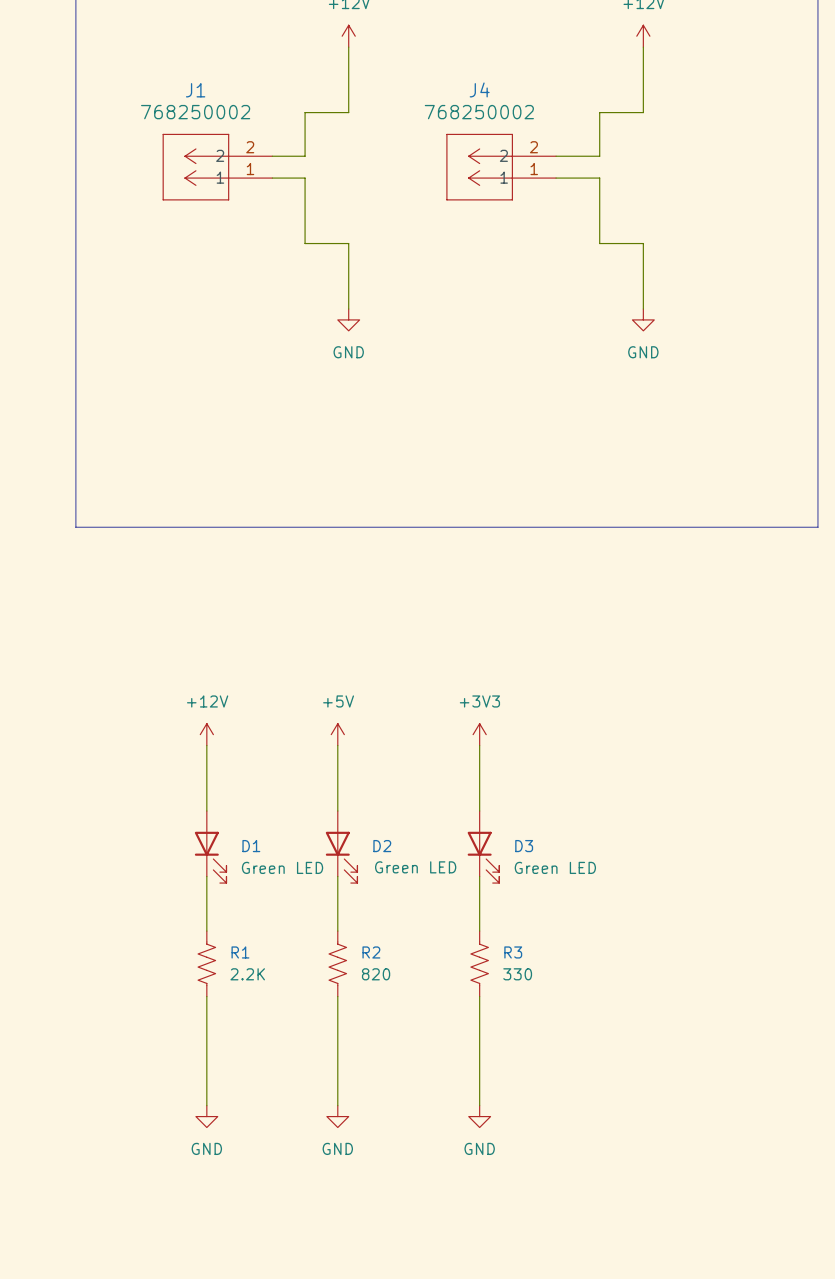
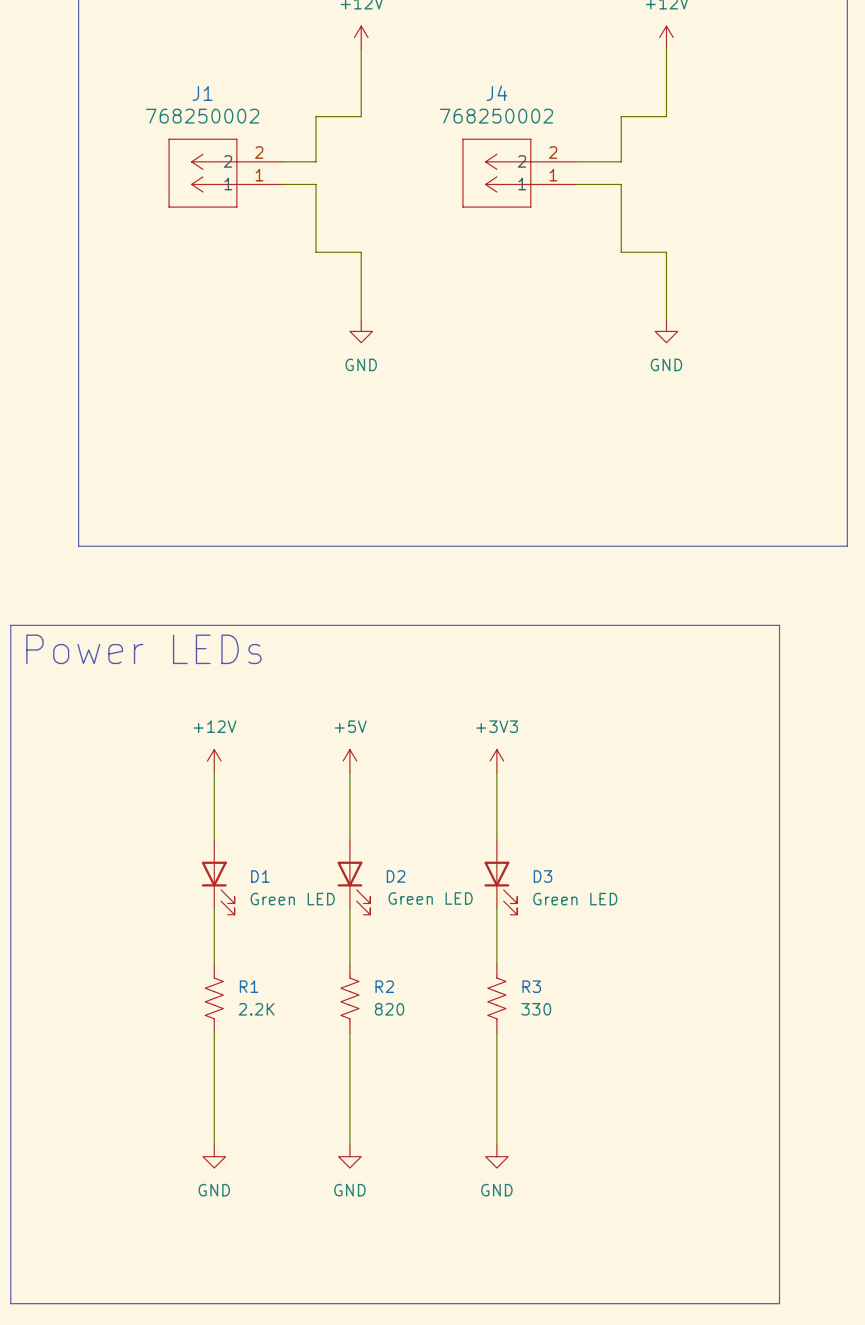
line: none -> (10, 625) (779, 625) (779, 1303) (10, 1303) (10, 625)
text: none -> Power LEDs (143, 649)

